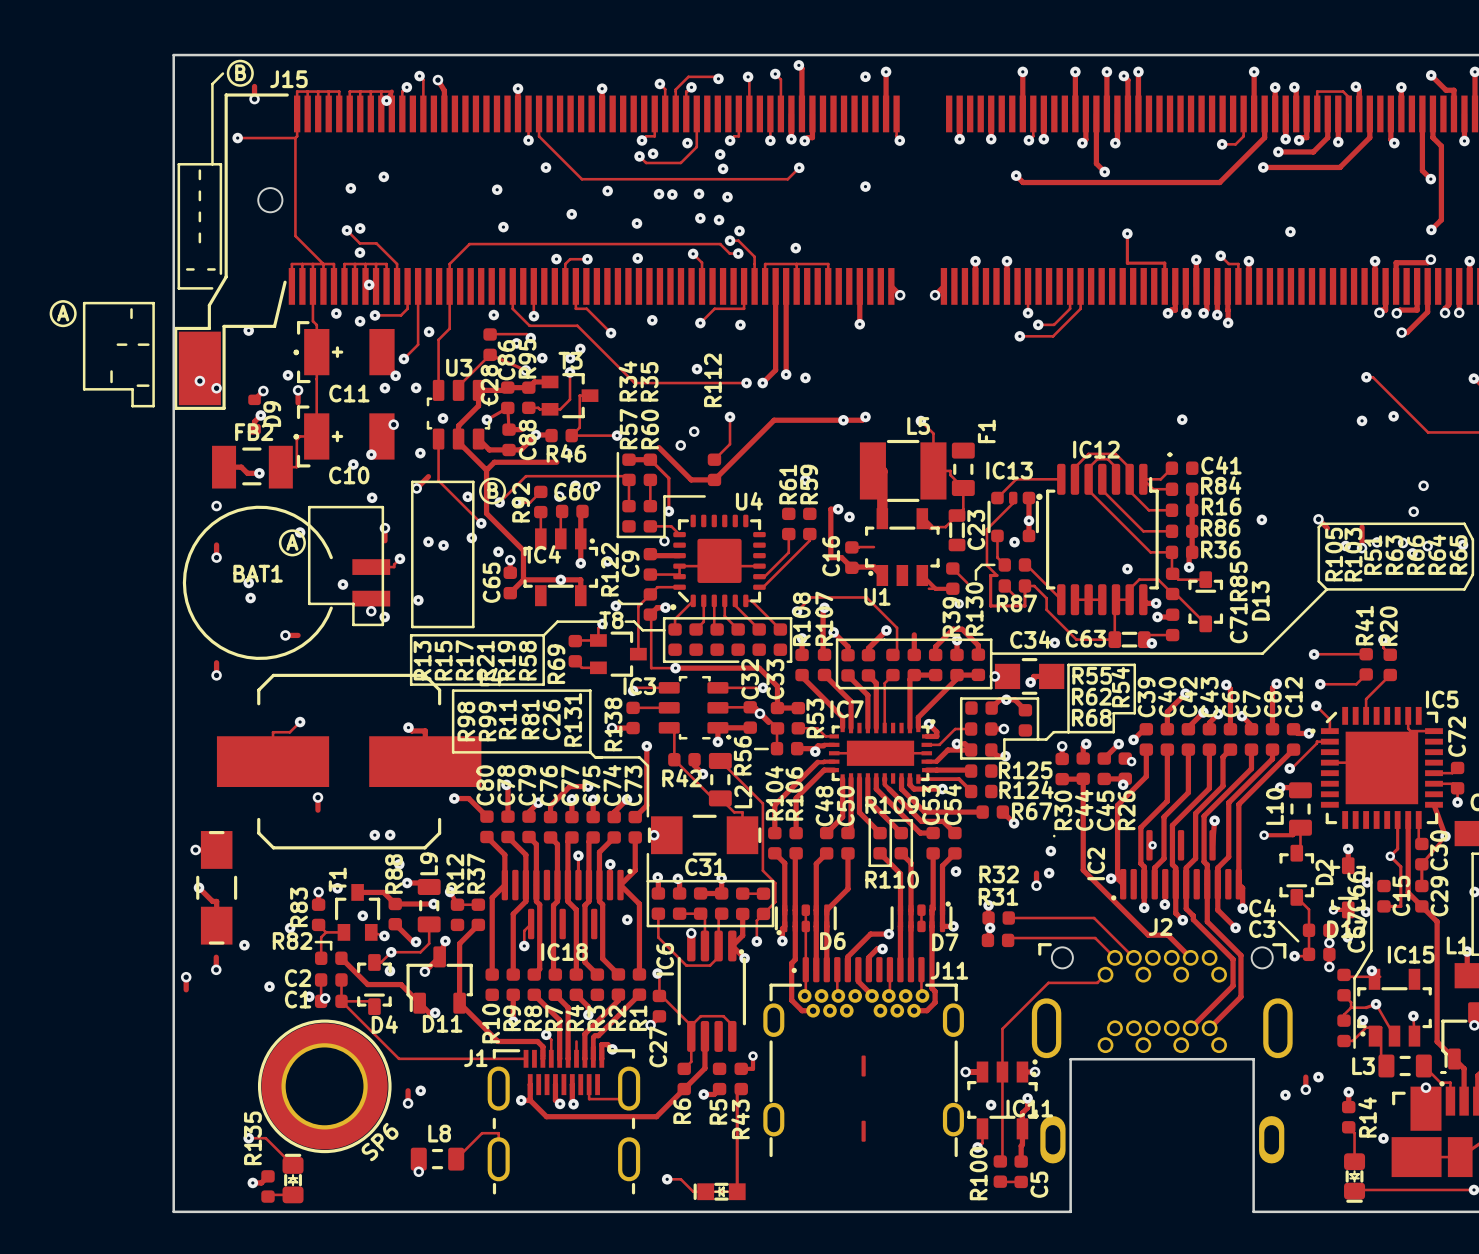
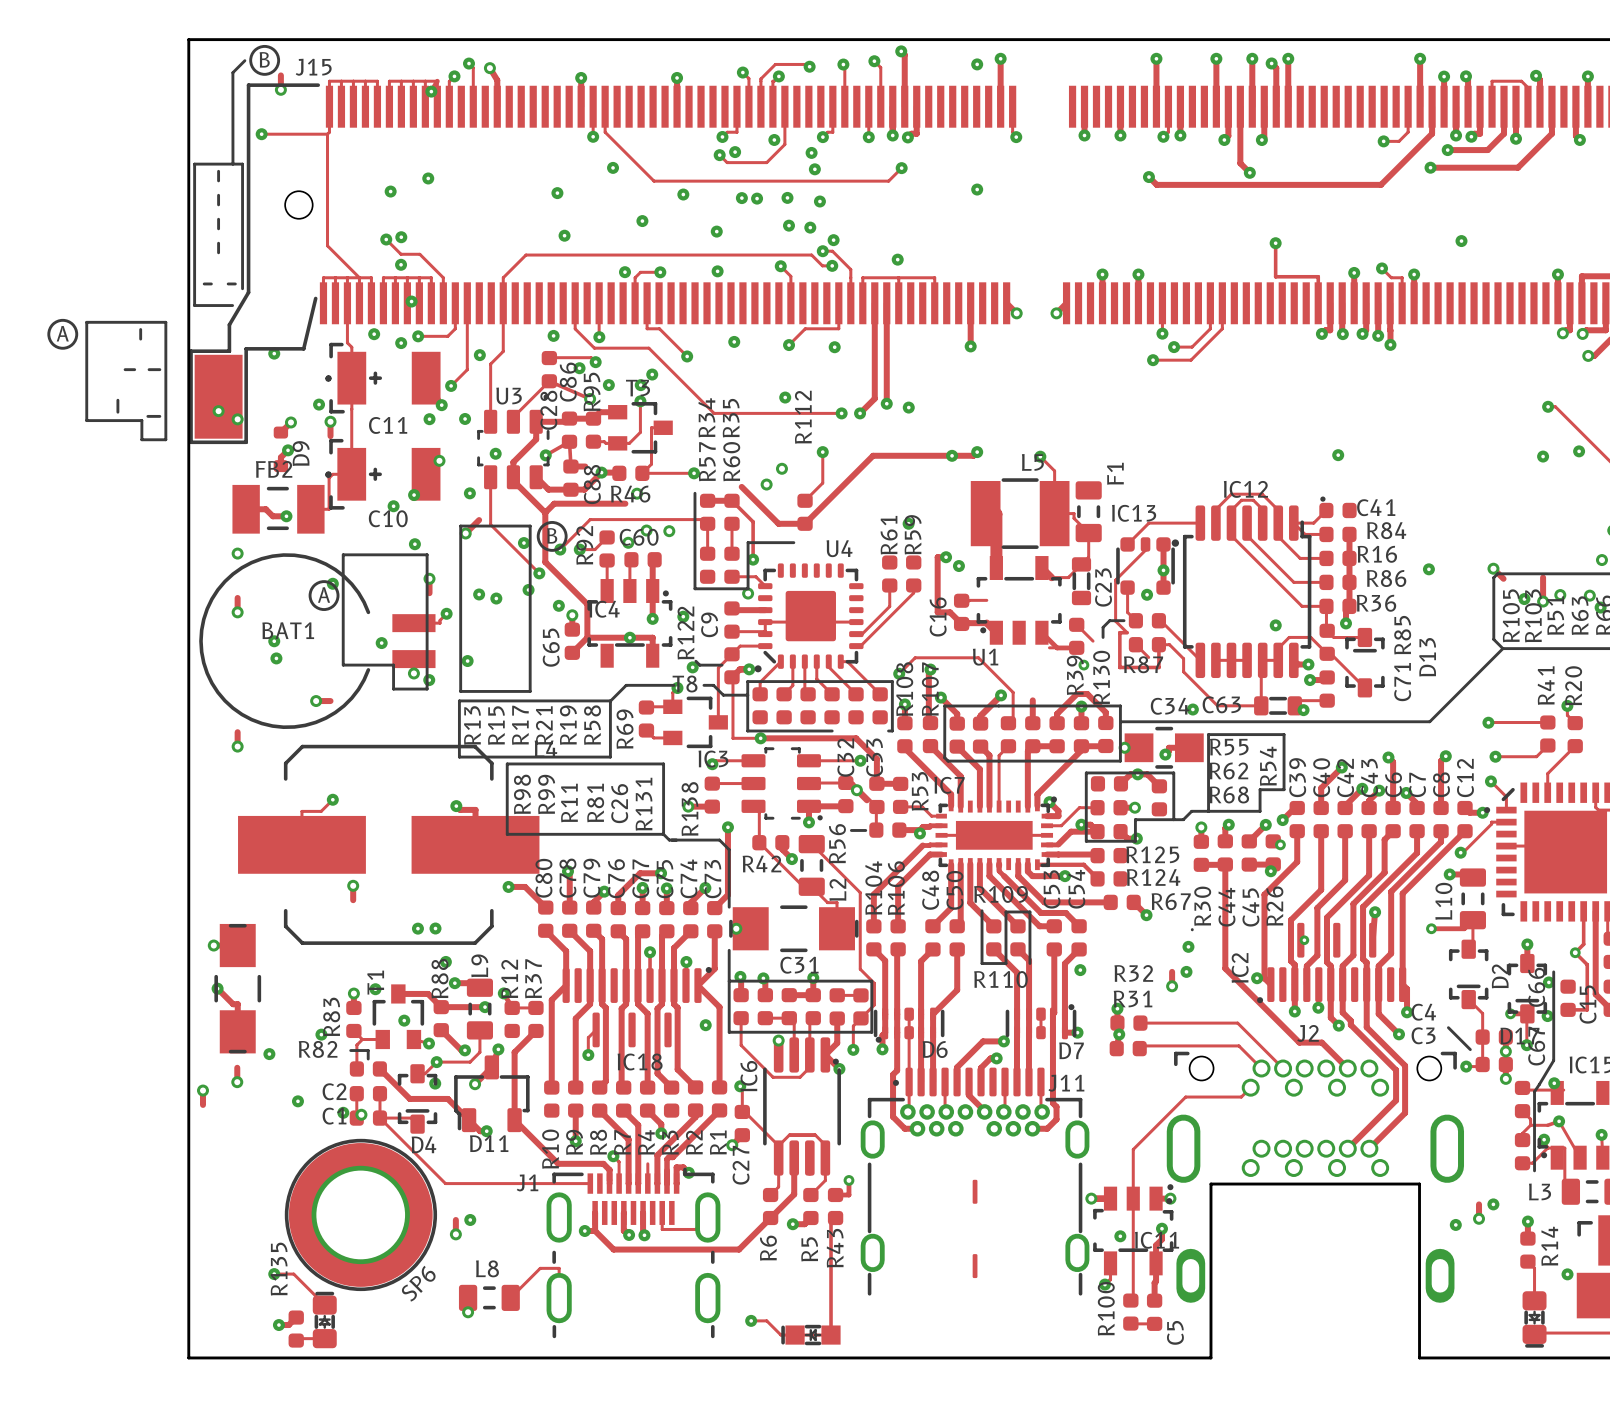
track: none -> (825, 1158) (825, 1180) (810, 1195)

